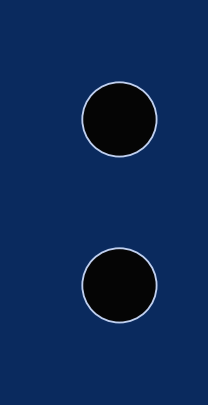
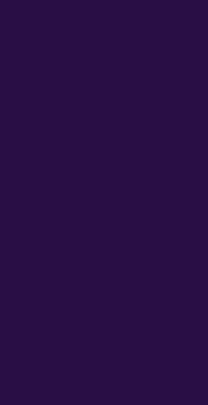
part: (119, 119) -> none
part: (119, 285) -> none

